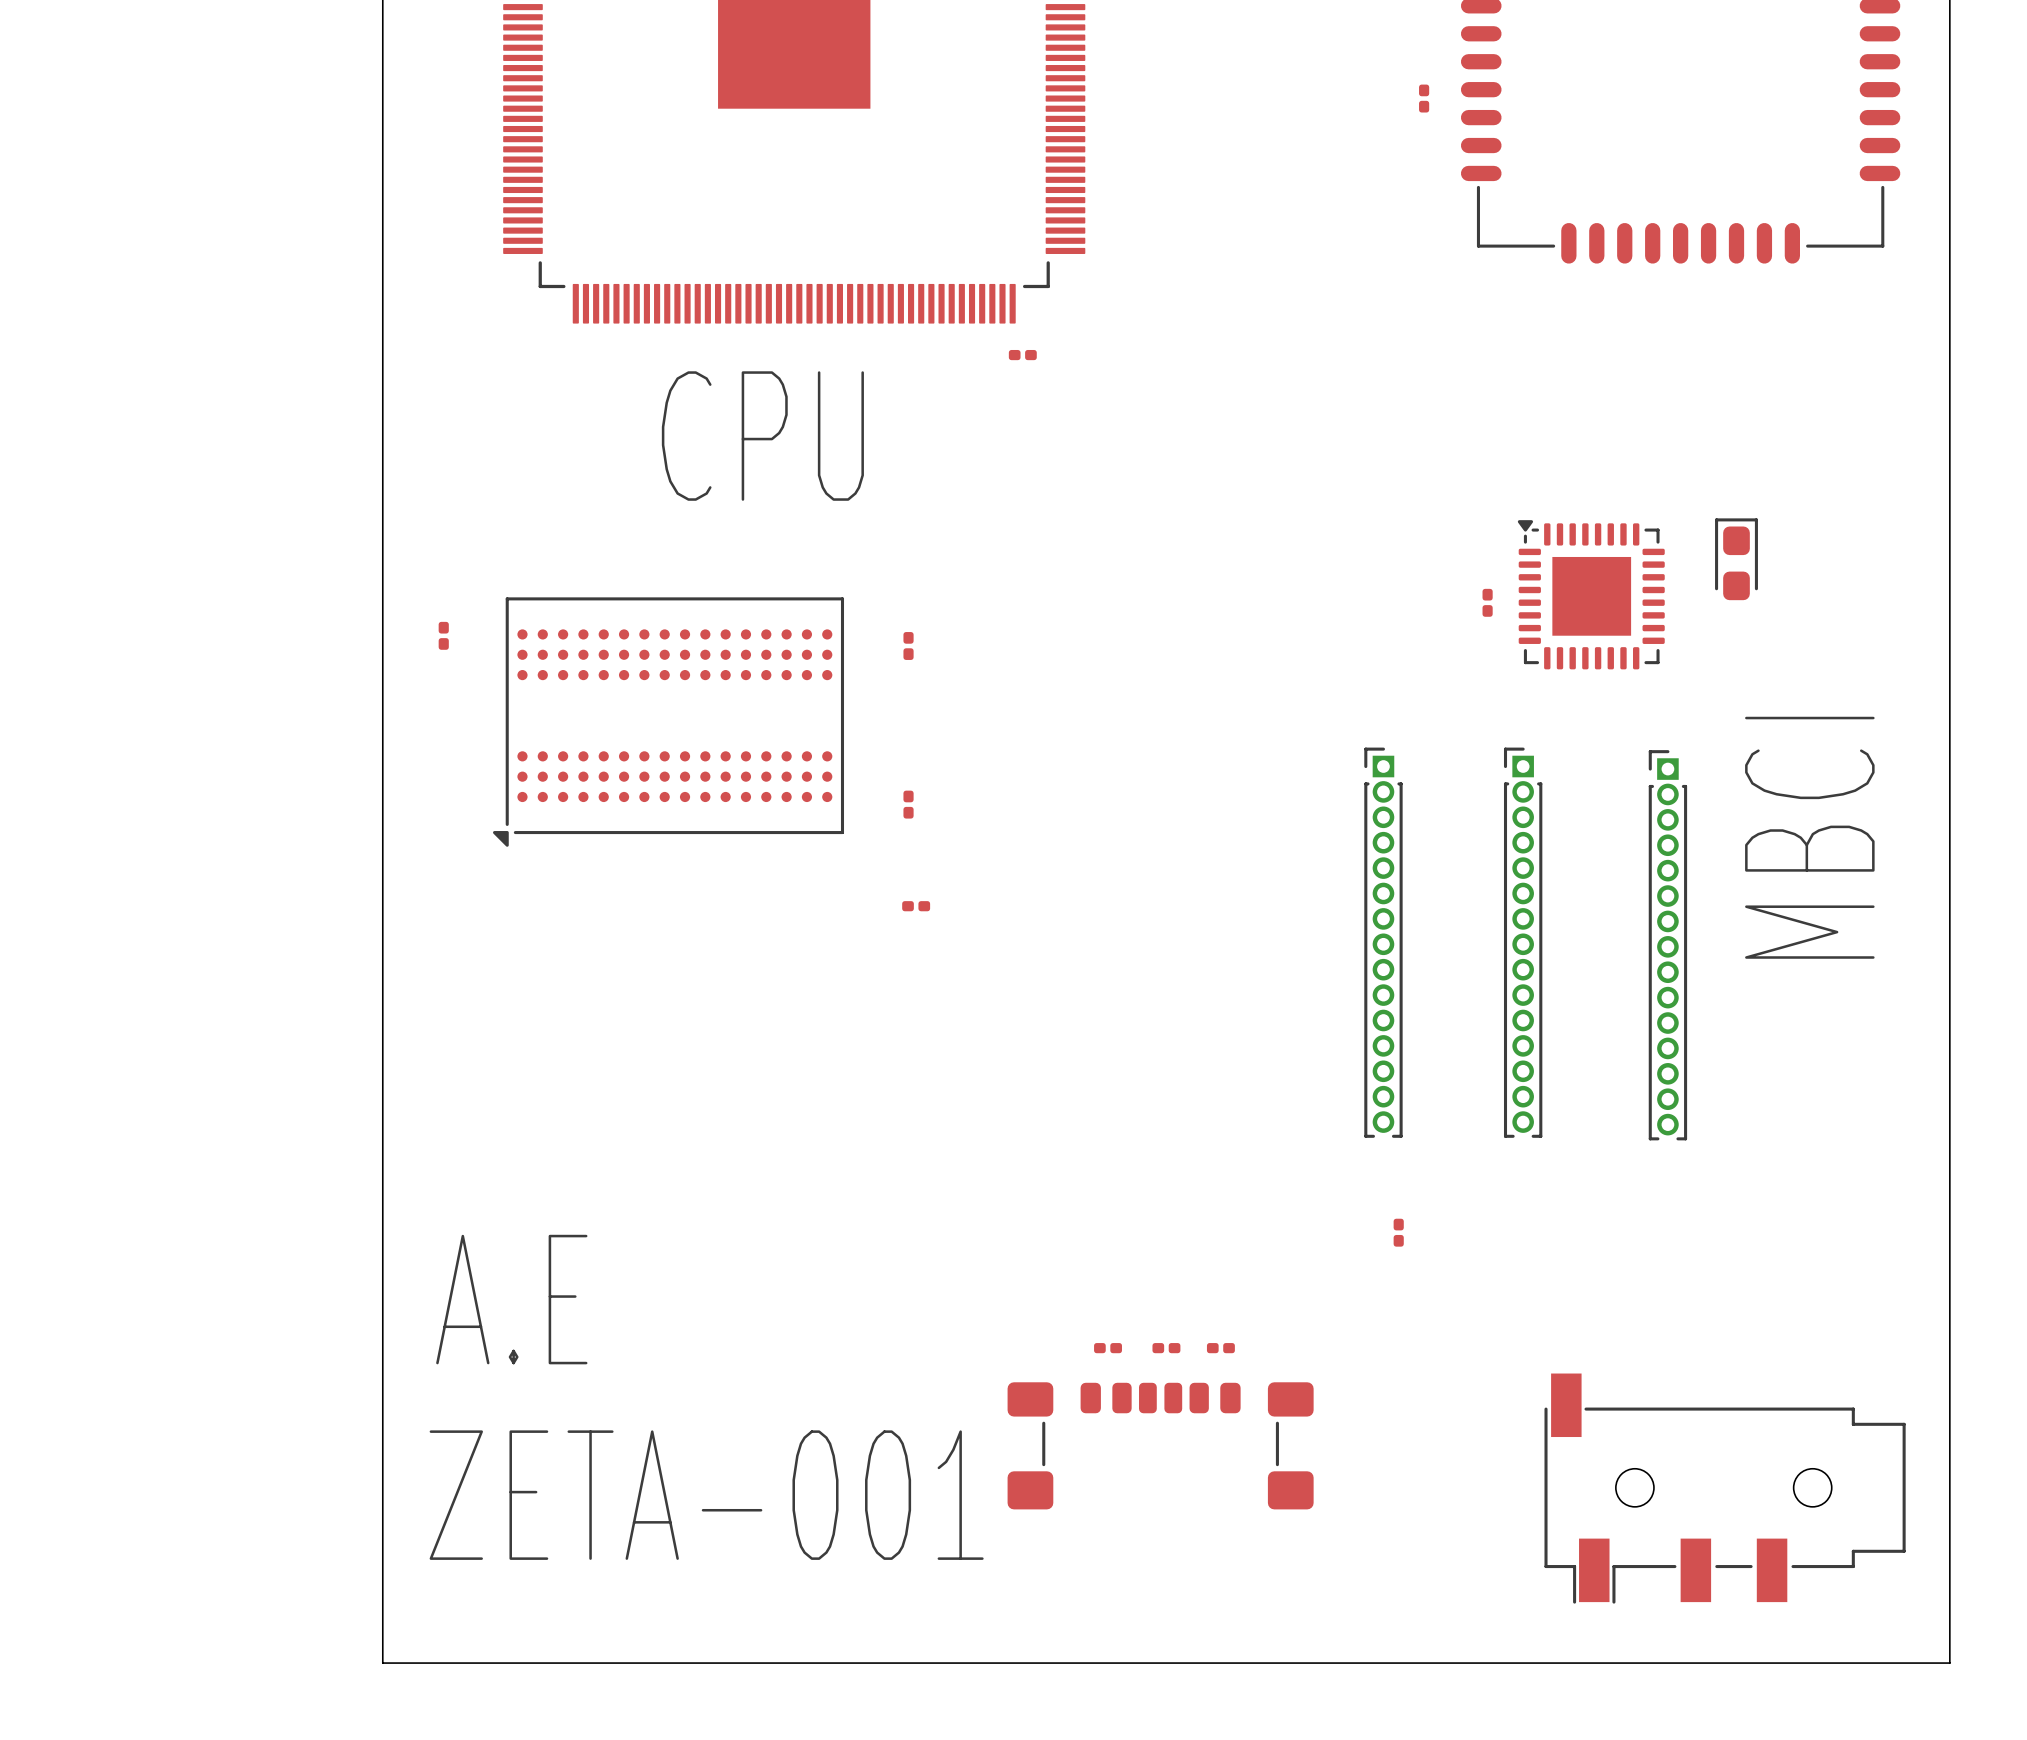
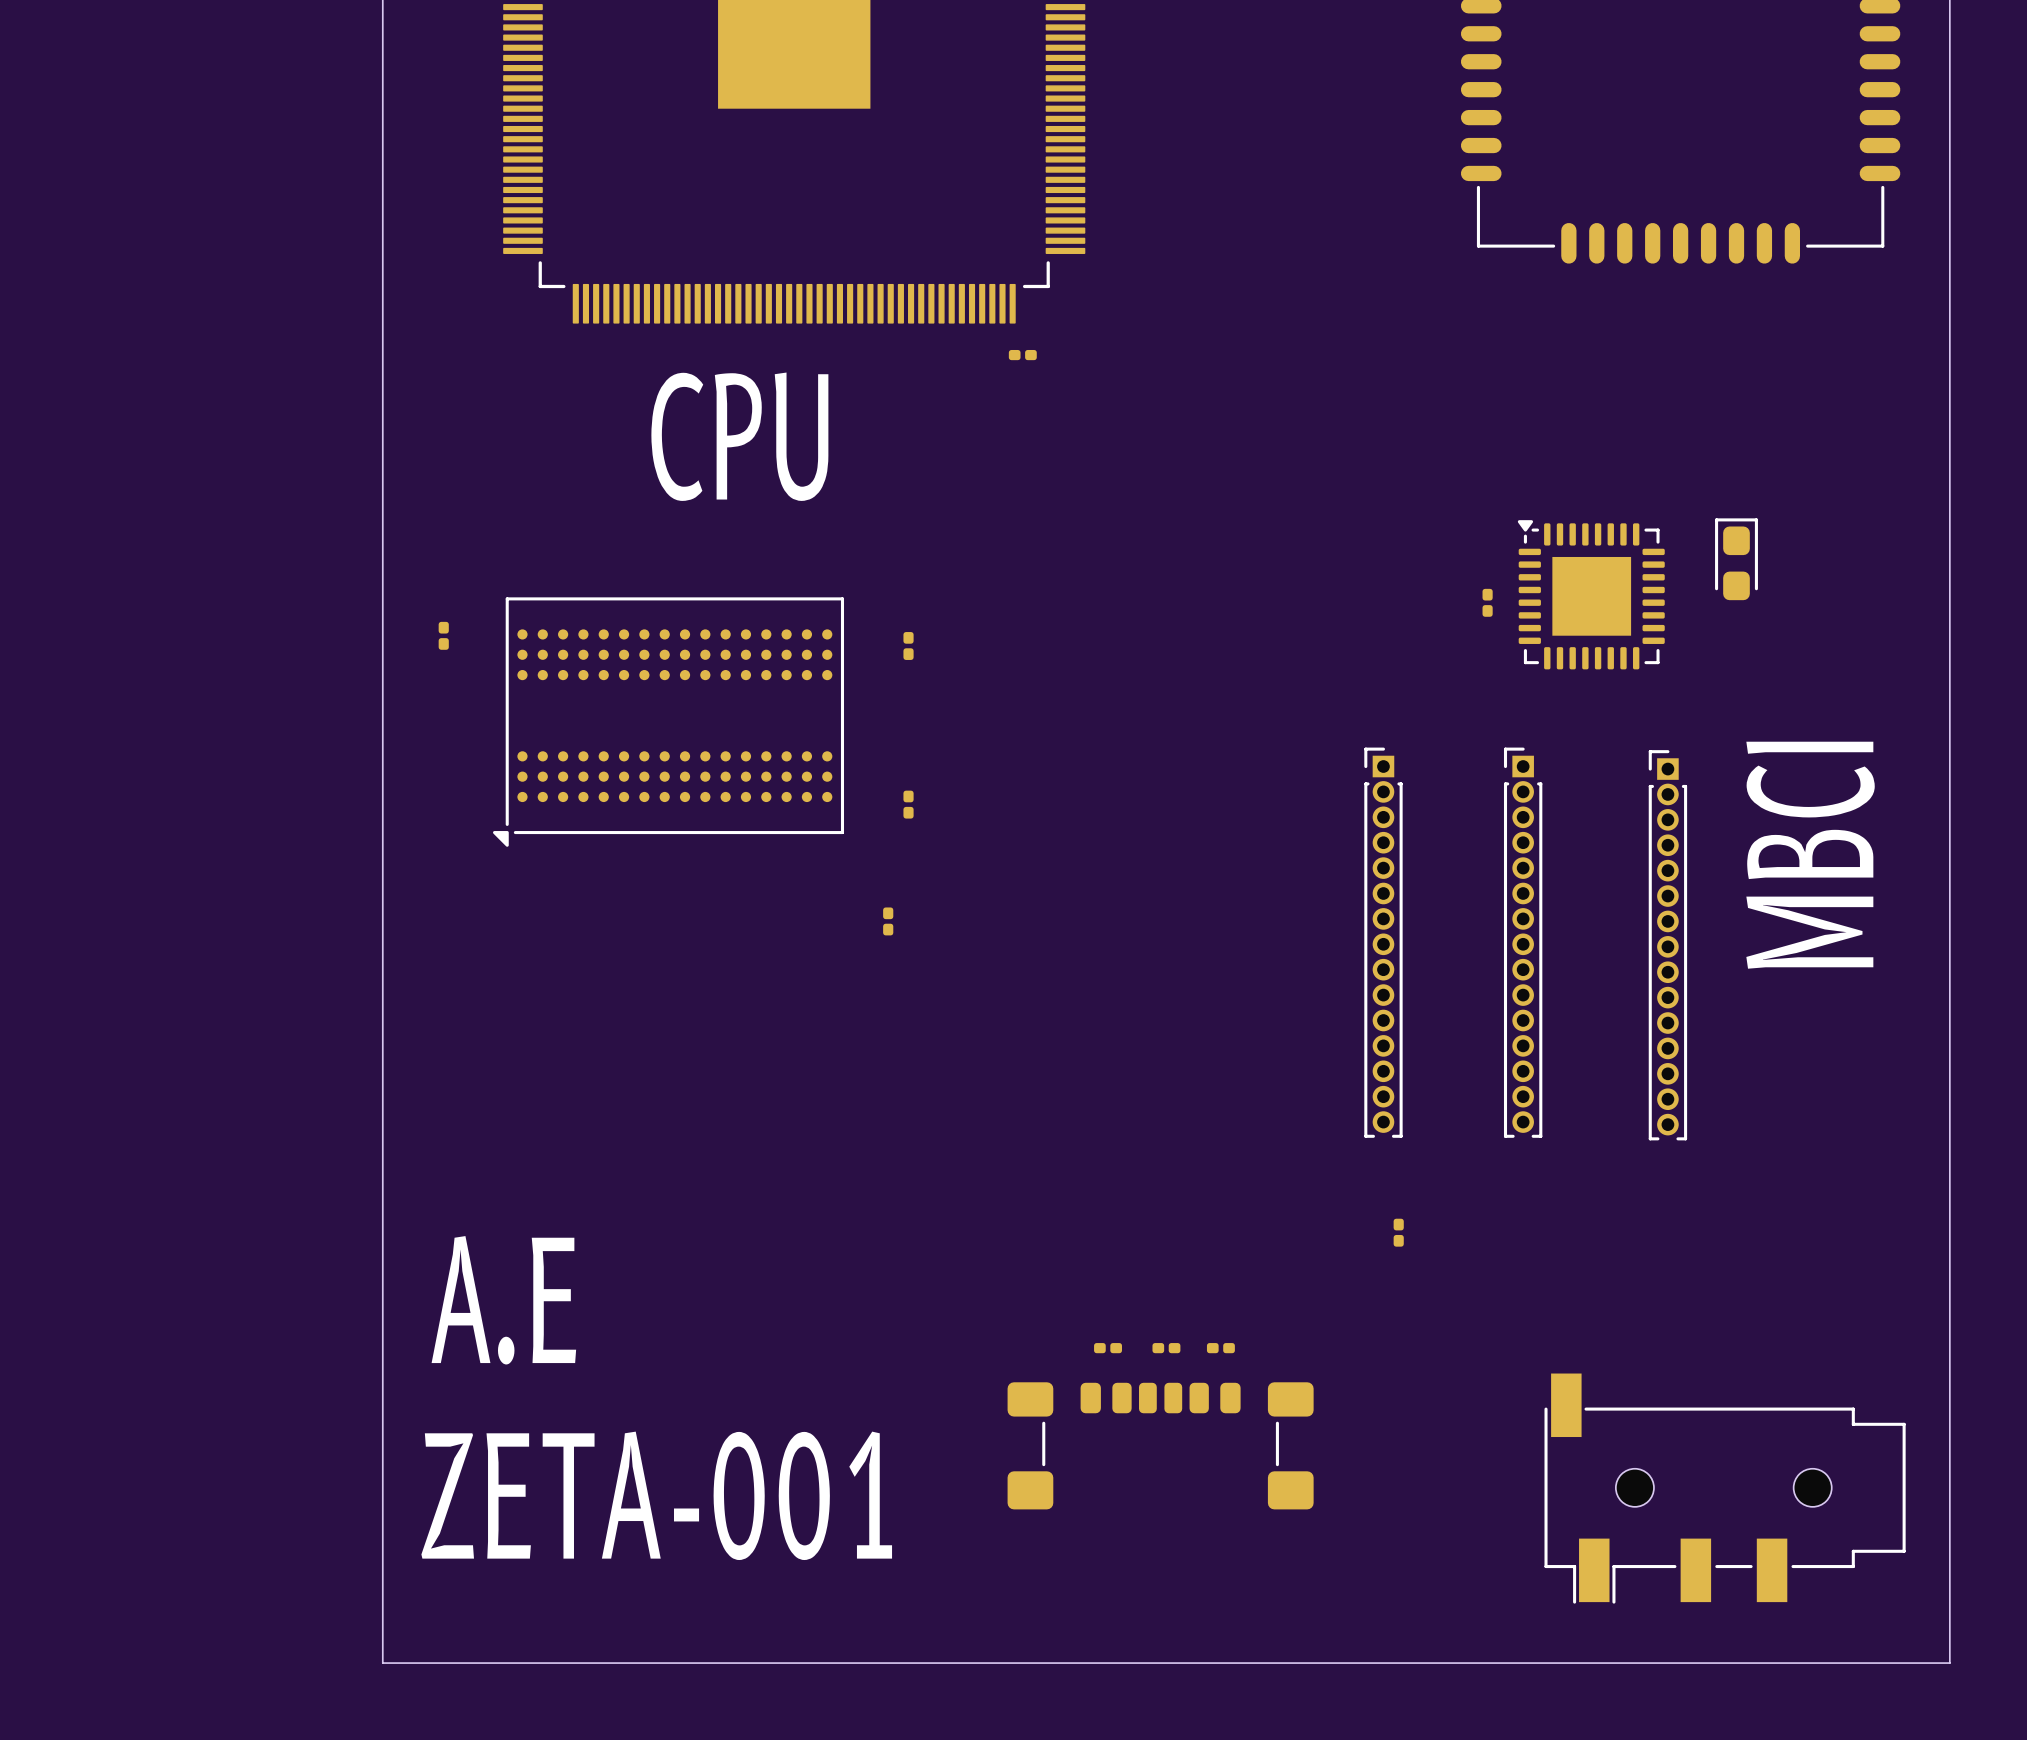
part: (1424, 98) -> none
part rotation: 0° (916, 906) -> 90° clockwise (888, 921)
part position: (916, 906) -> (888, 921)

